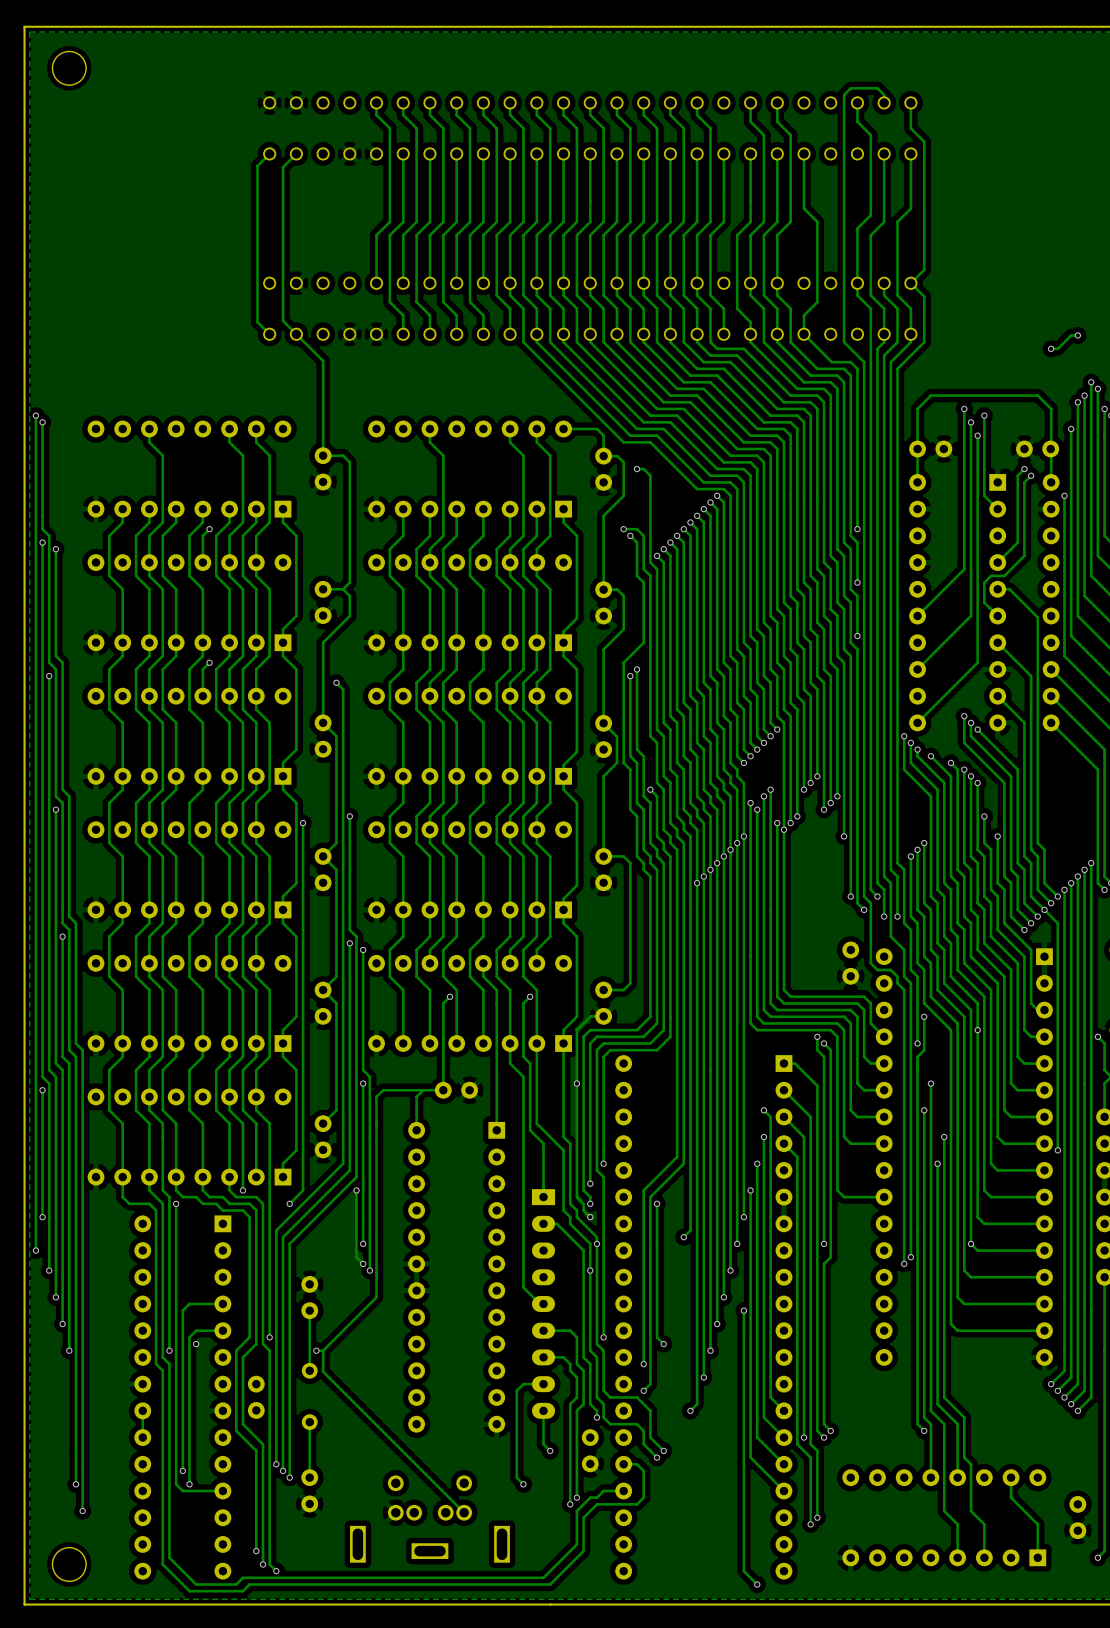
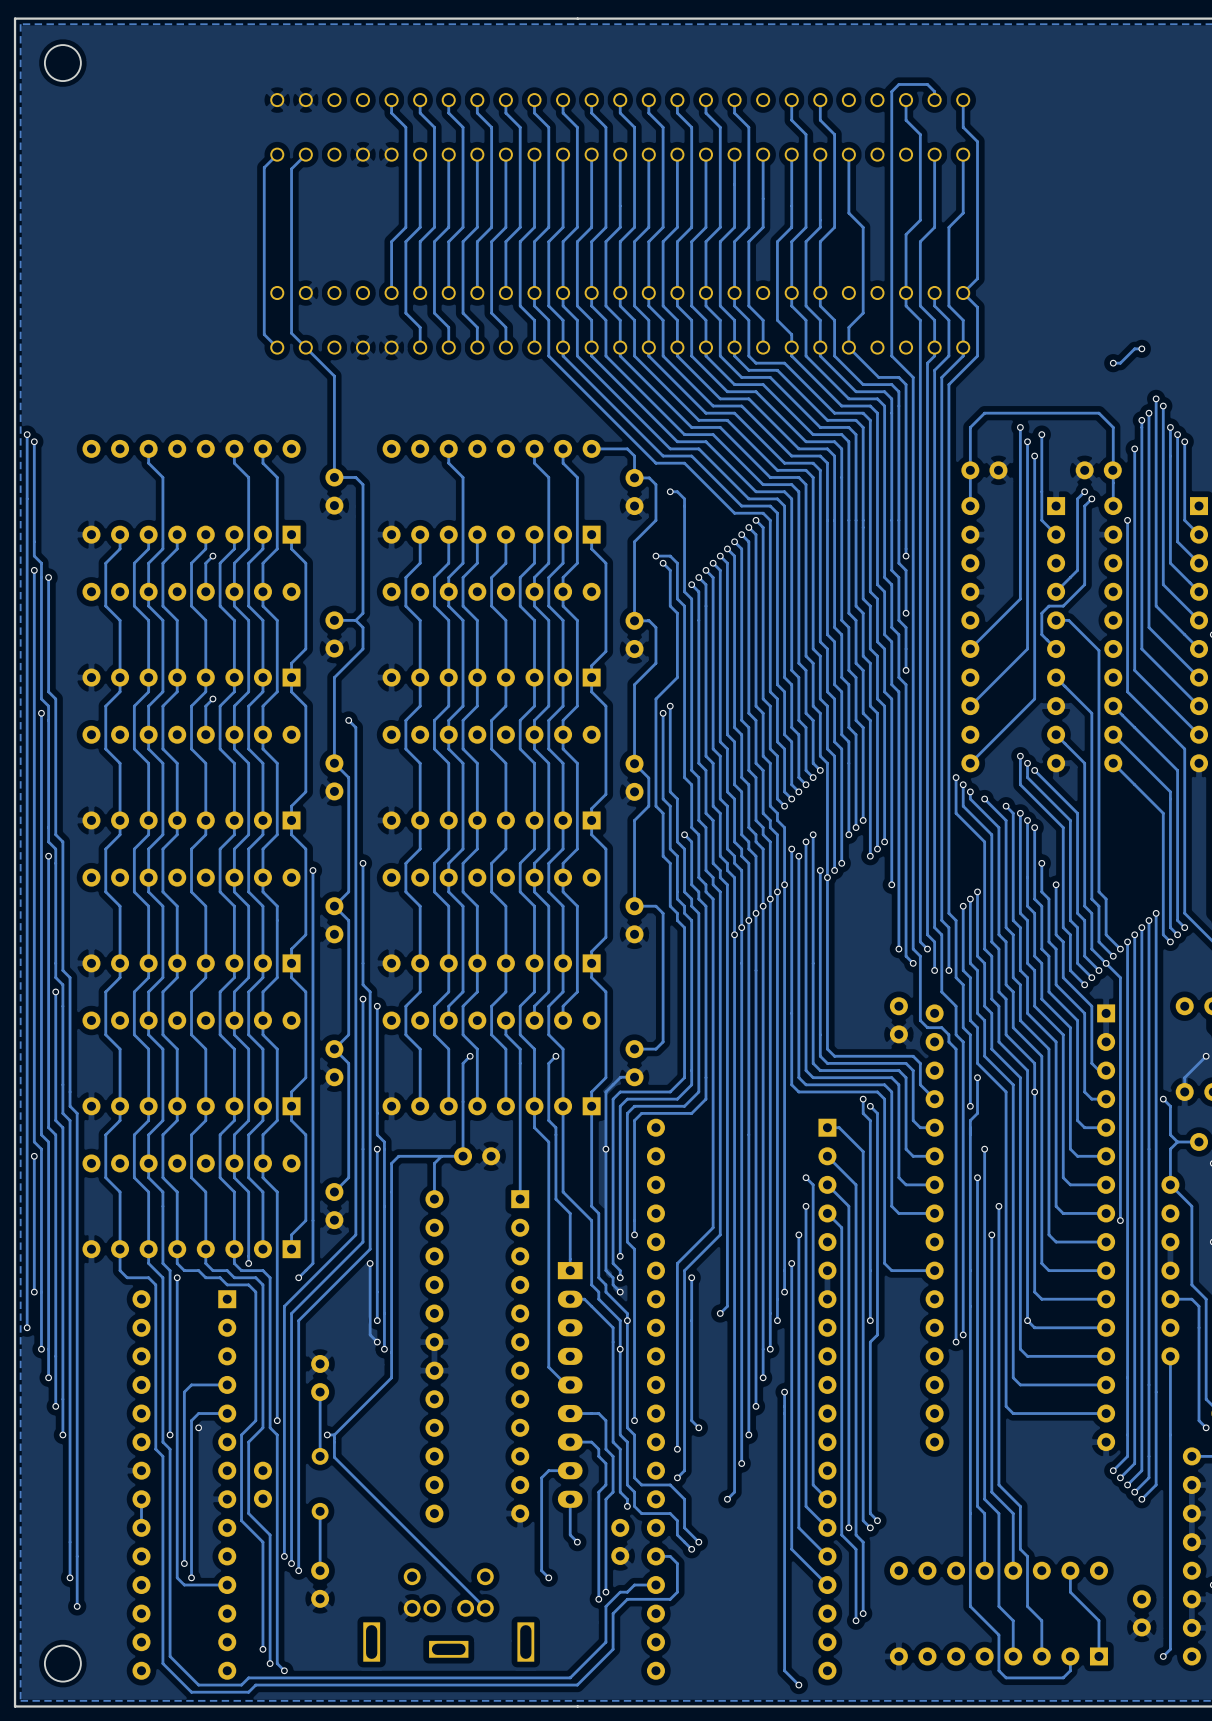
track: (917, 1424) (924, 1430) -> (970, 1513) (970, 1606) (998, 1635) (998, 1670) (1006, 1677) (1063, 1677) (1070, 1670) (1070, 1656)
via: (924, 1430) -> none

